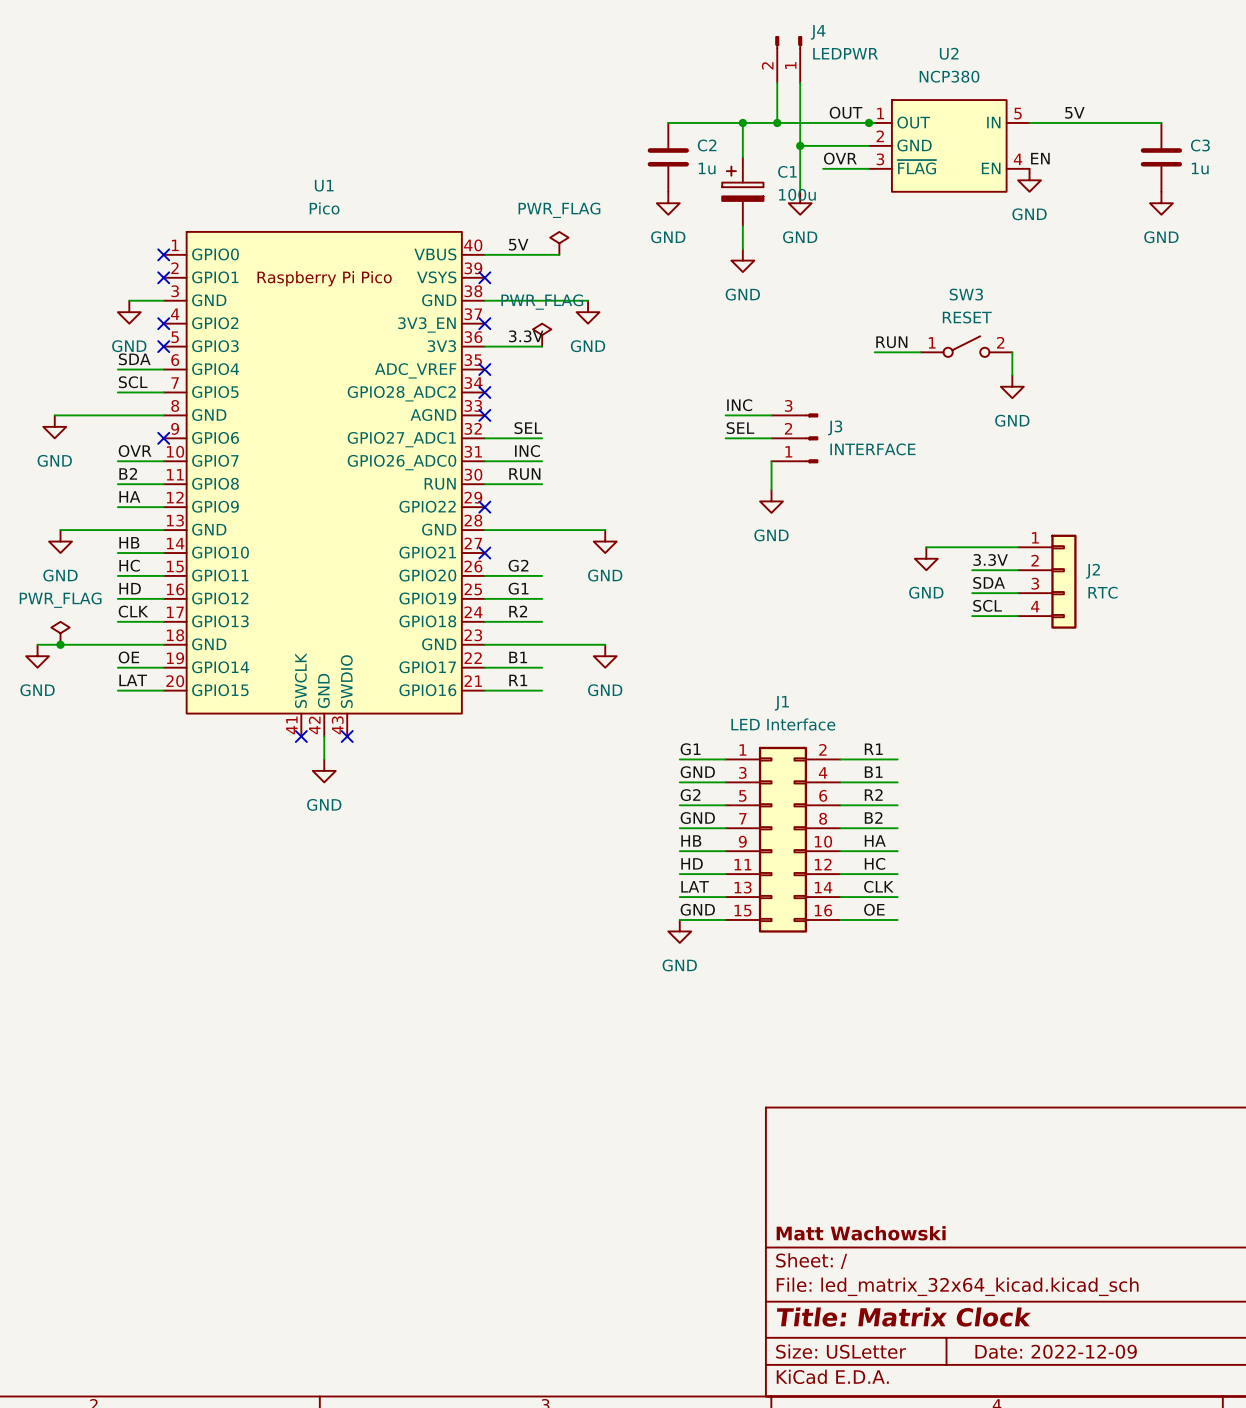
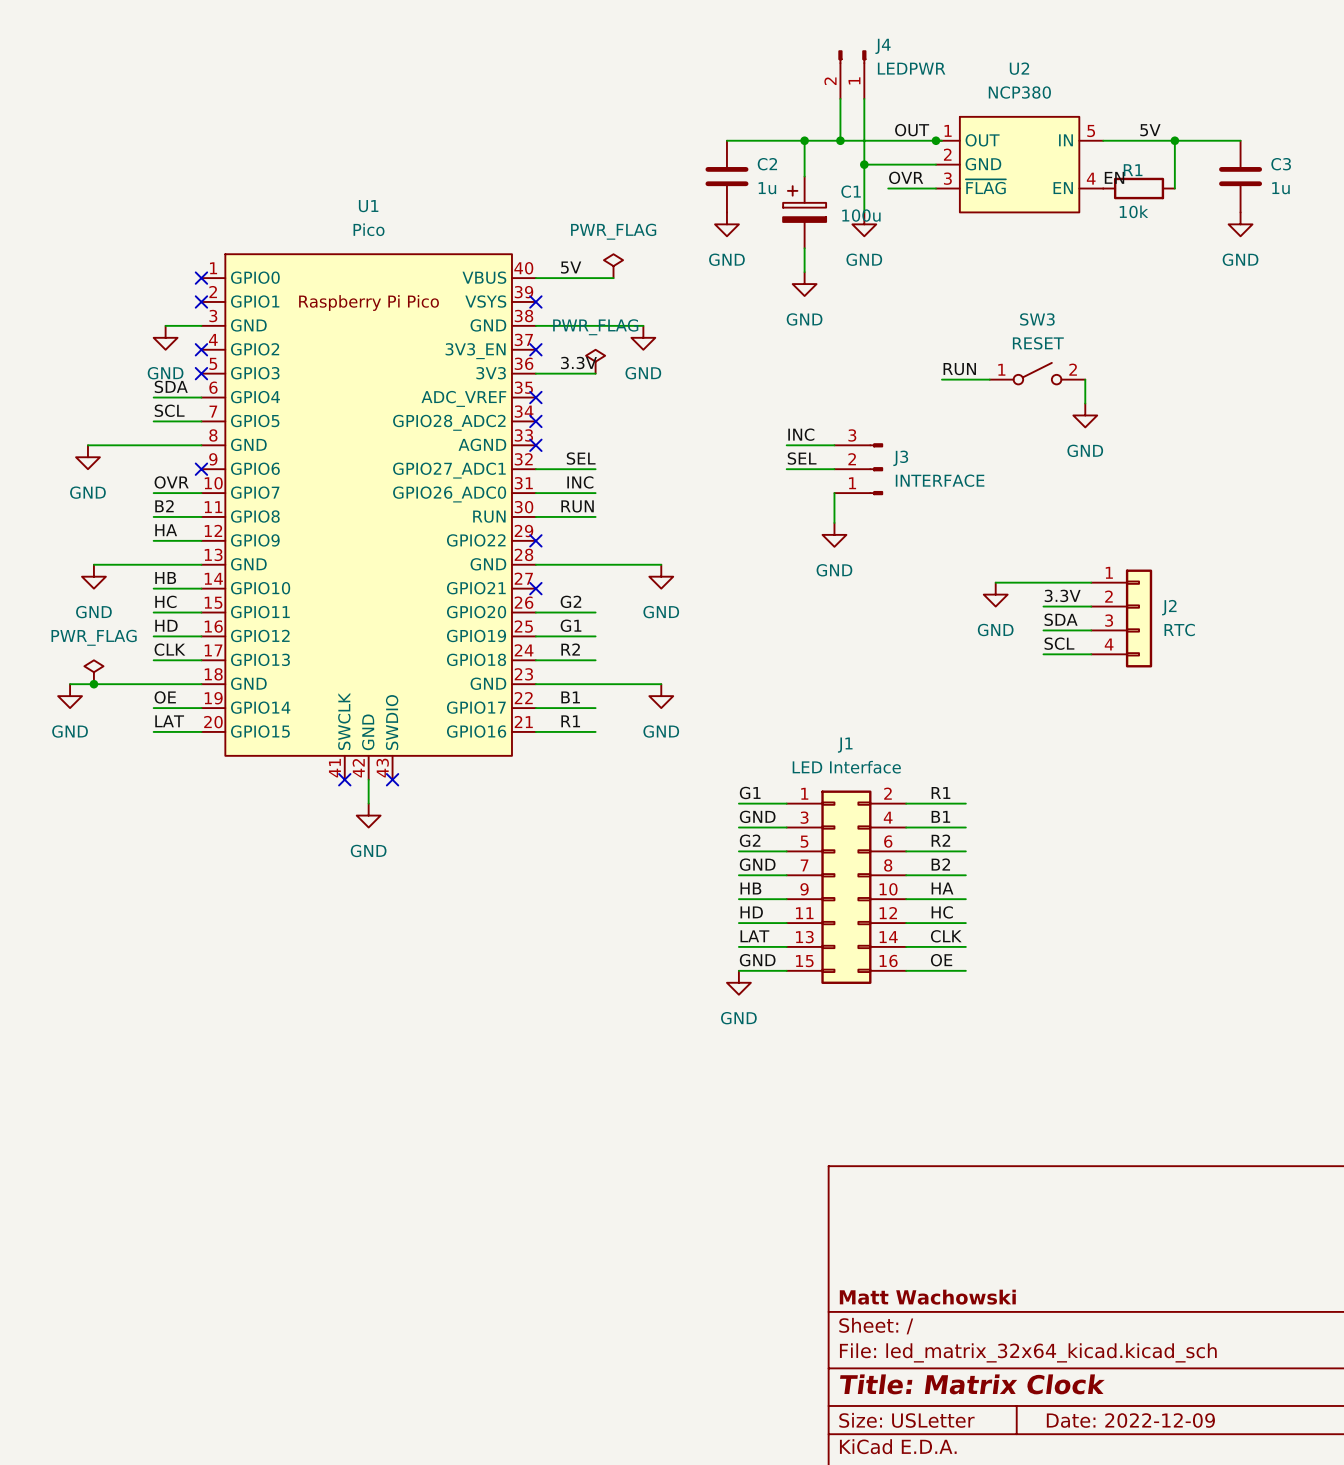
wire: none -> (1174, 140) (1174, 188)
junction: none -> (1174, 140)
R1: none -> 10k (1139, 188)
power symbol: GND (1029, 180) -> none

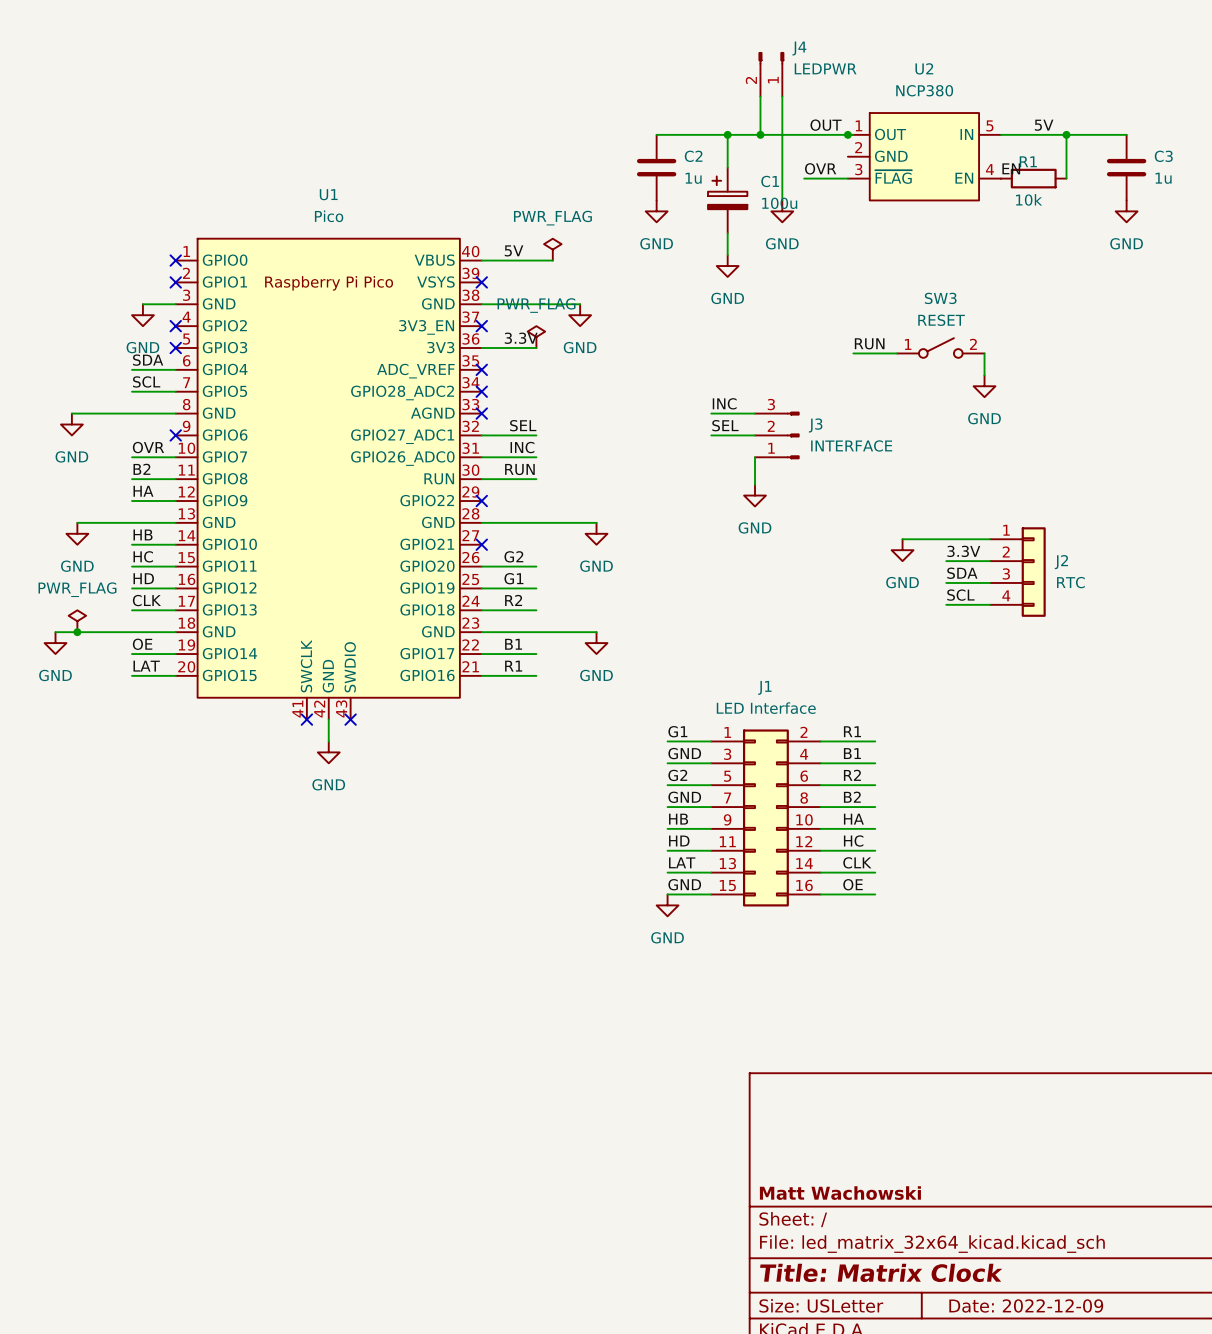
wire: (864, 164) (935, 164) -> none
junction: (864, 164) -> none

